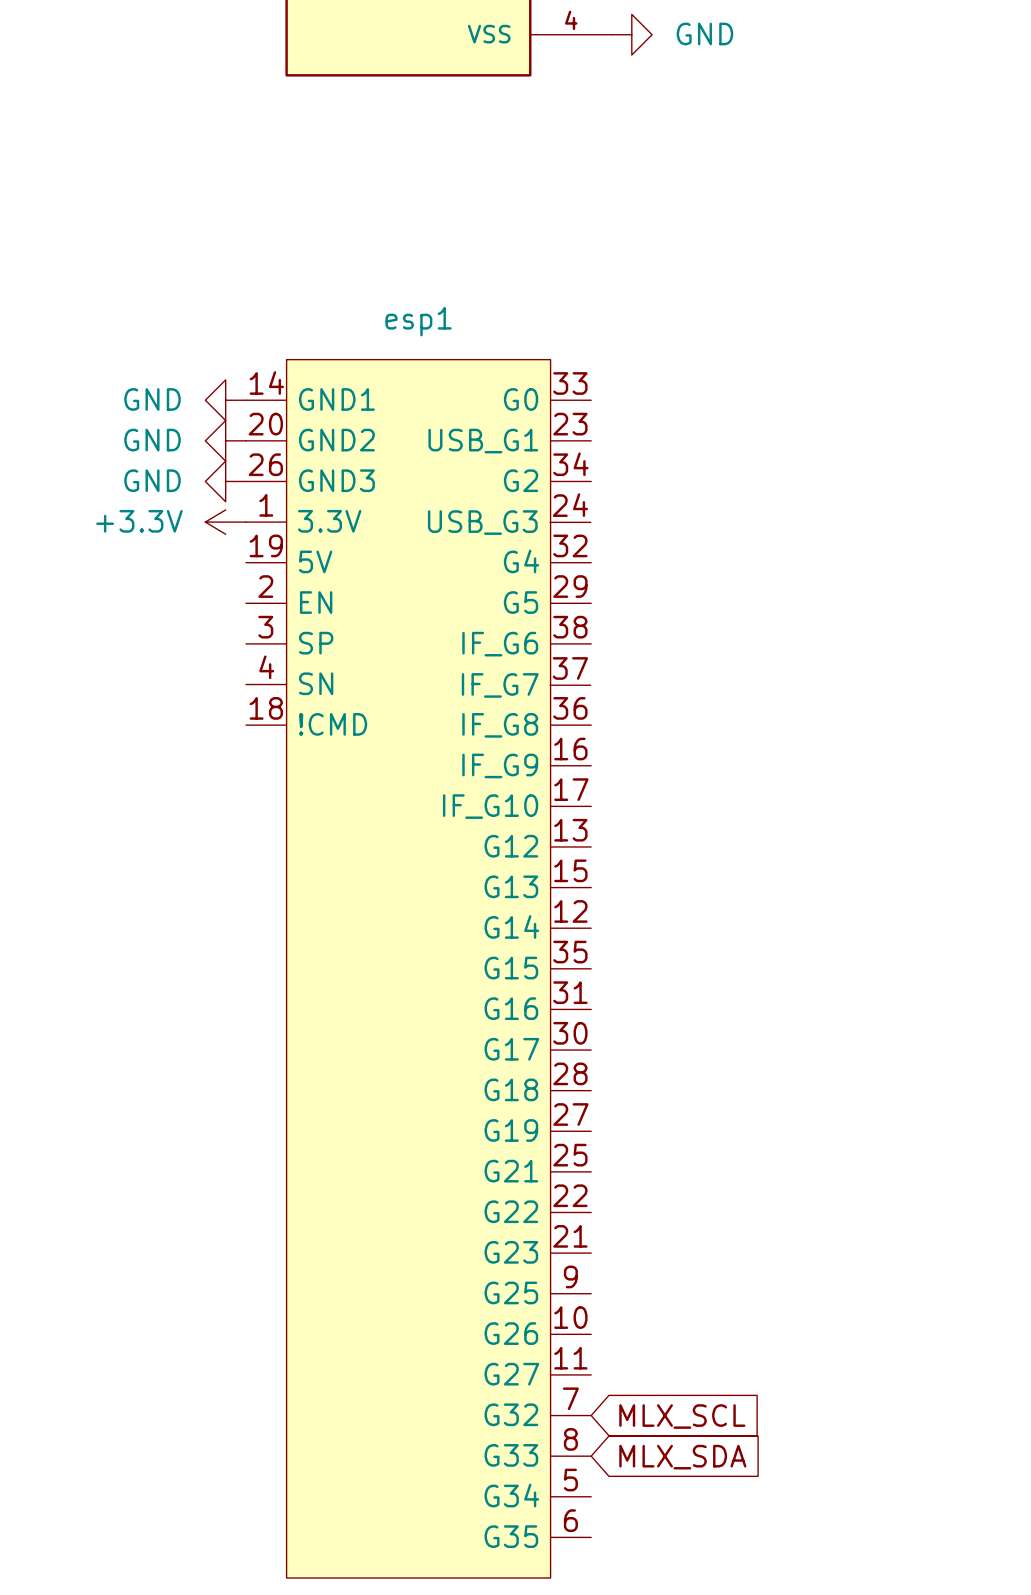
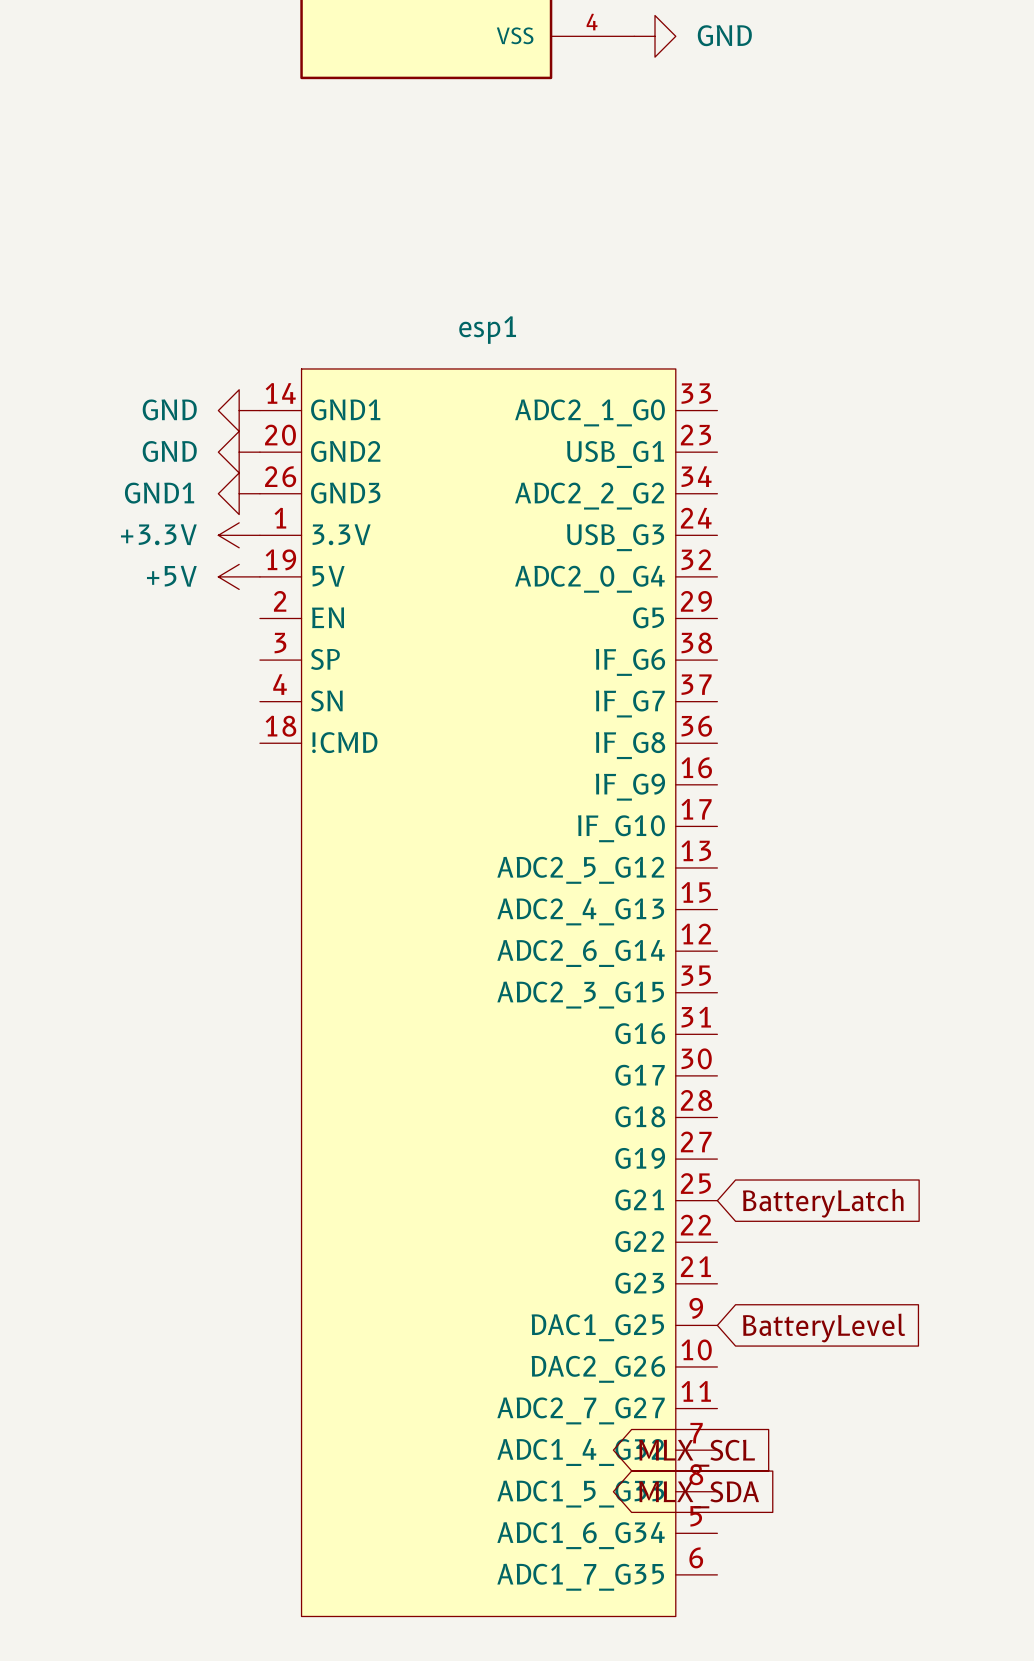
esp1 symbol: [245, 359, 592, 1579] -> [259, 368, 718, 1617]
power symbol: GND (225, 481) -> GND1 (239, 493)
power symbol: none -> +5V (239, 576)
global label: none -> BatteryLatch (823, 1203)
global label: none -> BatteryLevel (824, 1328)

